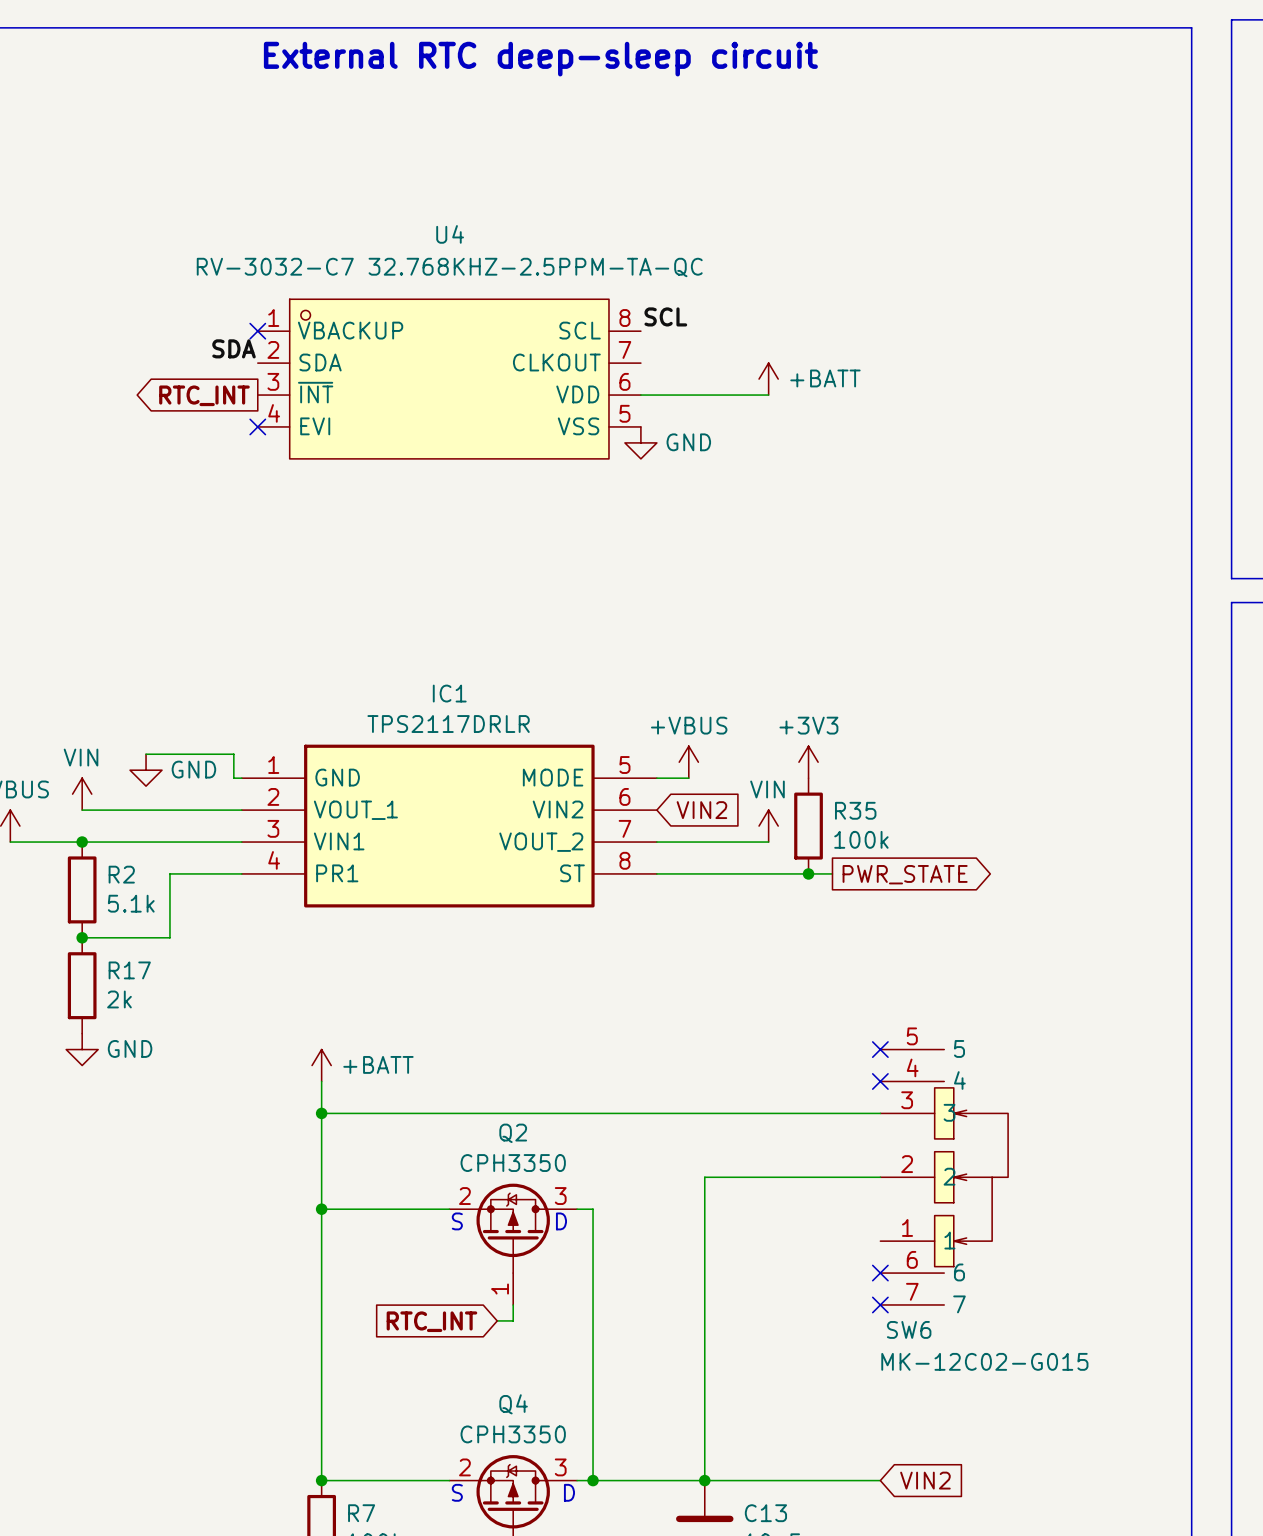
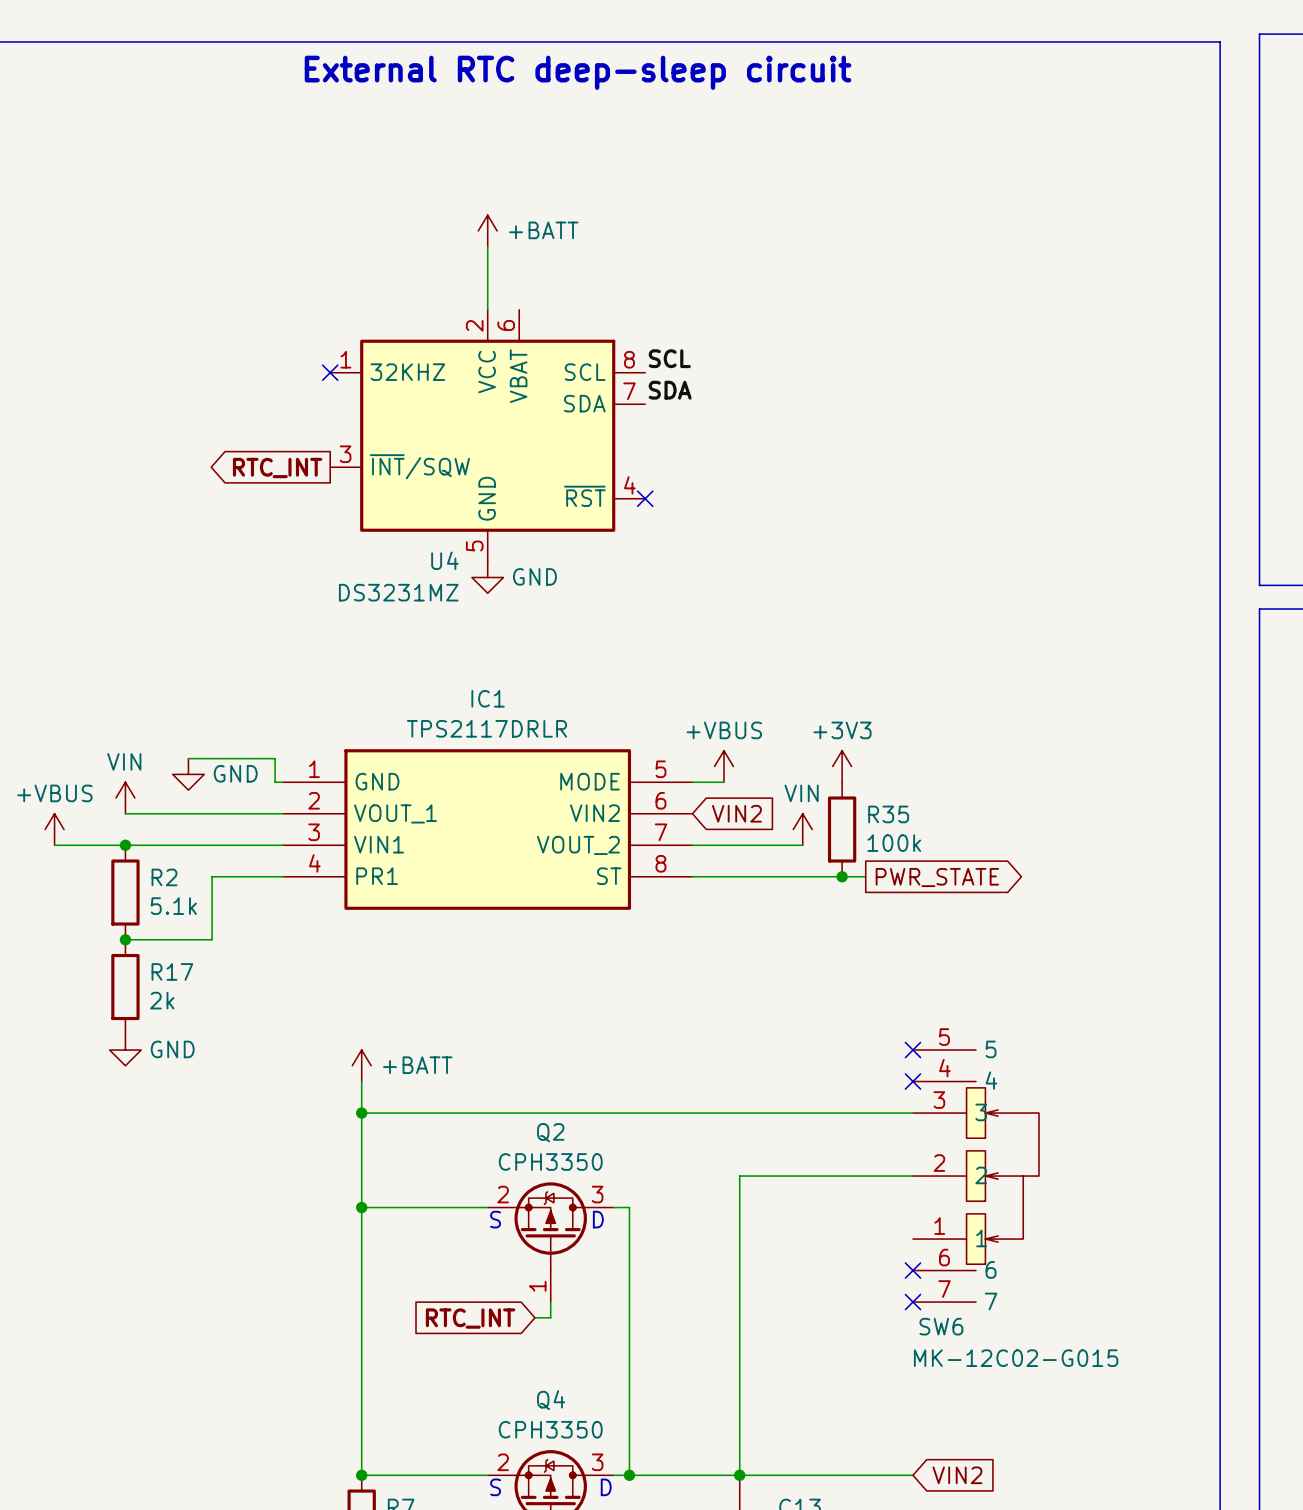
power symbol: none -> +BATT (487, 230)
U4 name position: U4 (450, 234) -> U4 (444, 560)
wire: none -> (487, 246) (487, 309)
U4 value: RV-3032-C7 32.768KHZ-2.5PPM-TA-QC (449, 267) -> DS3231MZ (398, 592)
U4 symbol: [257, 299, 641, 459] -> [330, 309, 646, 562]
label position: SCL (665, 316) -> SCL (669, 358)
no-connect mark: (257, 331) -> none
label: SDA (234, 348) -> none
no-connect mark: none -> (330, 372)
power symbol: +BATT (768, 379) -> none
label: none -> SDA (670, 390)
global label position: RTC_INT (204, 395) -> RTC_INT (277, 467)
wire: (640, 395) (768, 395) -> none
no-connect mark: (257, 426) -> none
power symbol position: GND (640, 442) -> GND (487, 577)
no-connect mark: none -> (645, 498)

